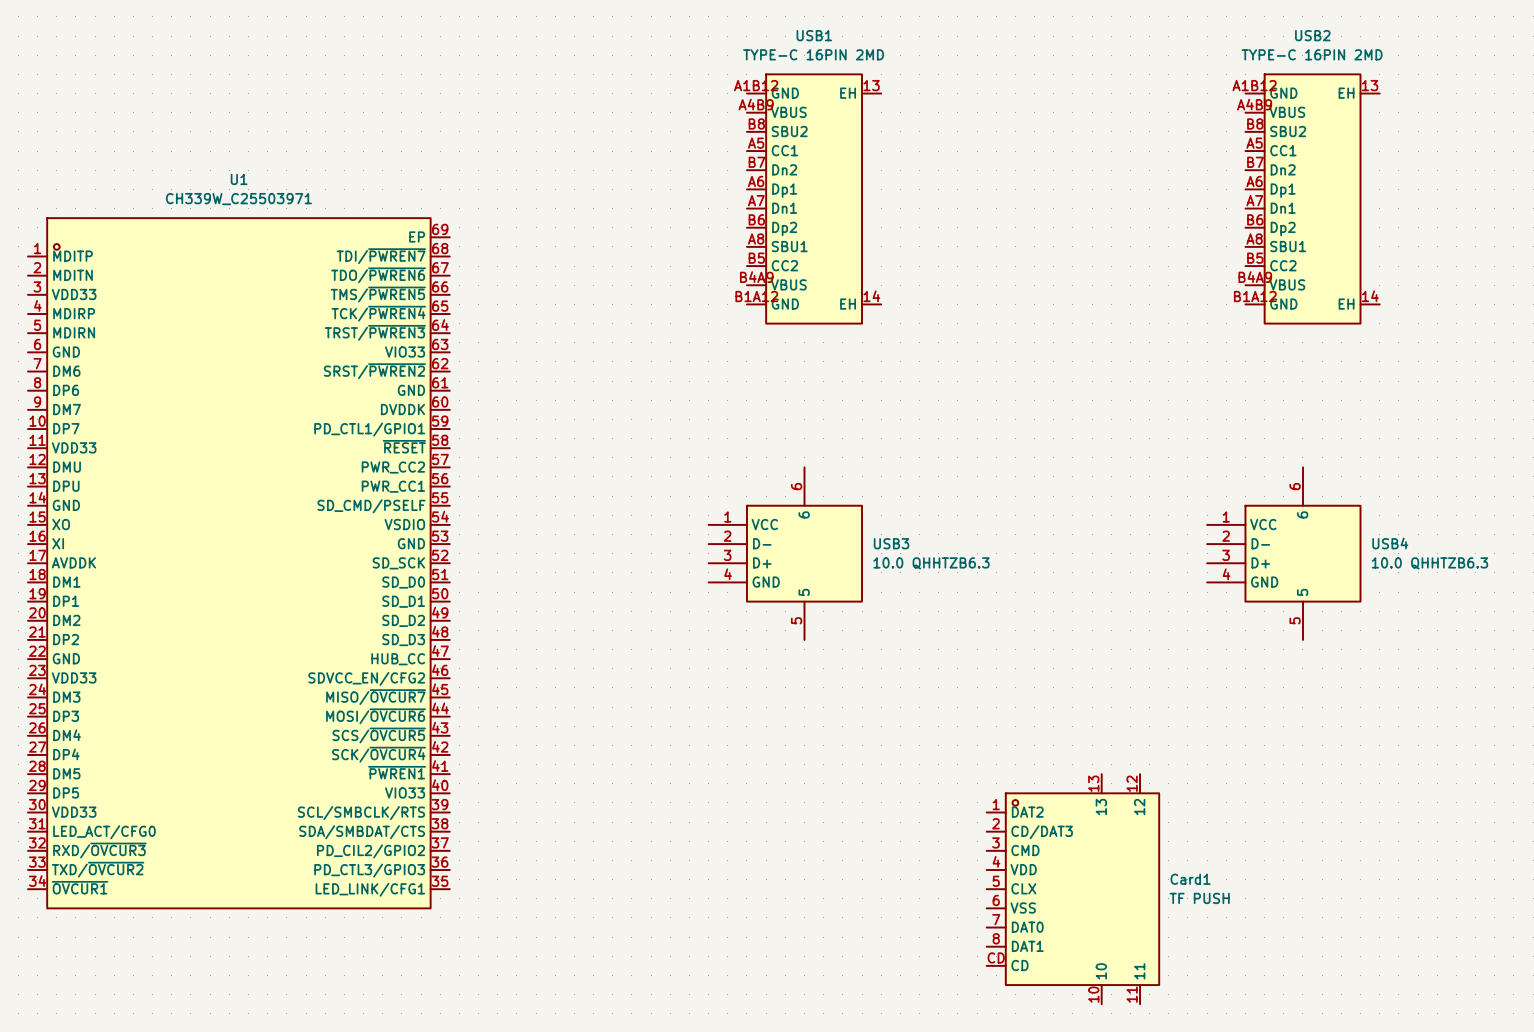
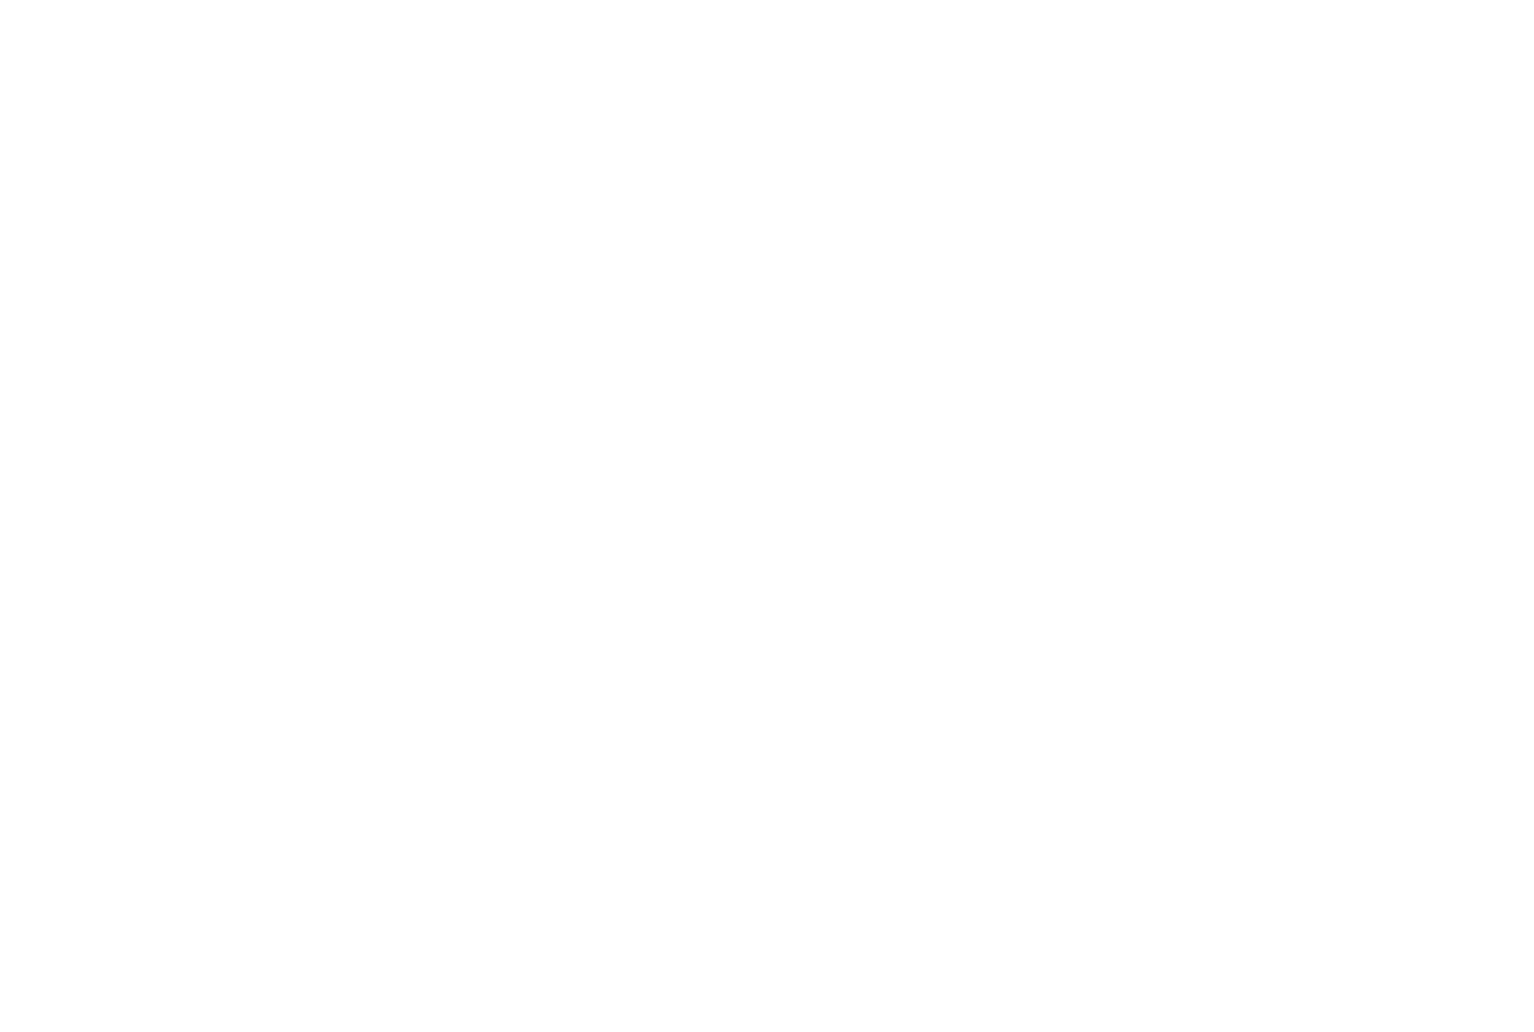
USB1: TYPE-C 16PIN 2MD (814, 198) -> none
USB2: TYPE-C 16PIN 2MD (1312, 198) -> none
USB3: 10.0 QHHTZB6.3 (785, 553) -> none
USB4: 10.0 QHHTZB6.3 (1283, 553) -> none
U1: CH339W_C25503971 (238, 563) -> none
Card1: TF PUSH (1072, 889) -> none

